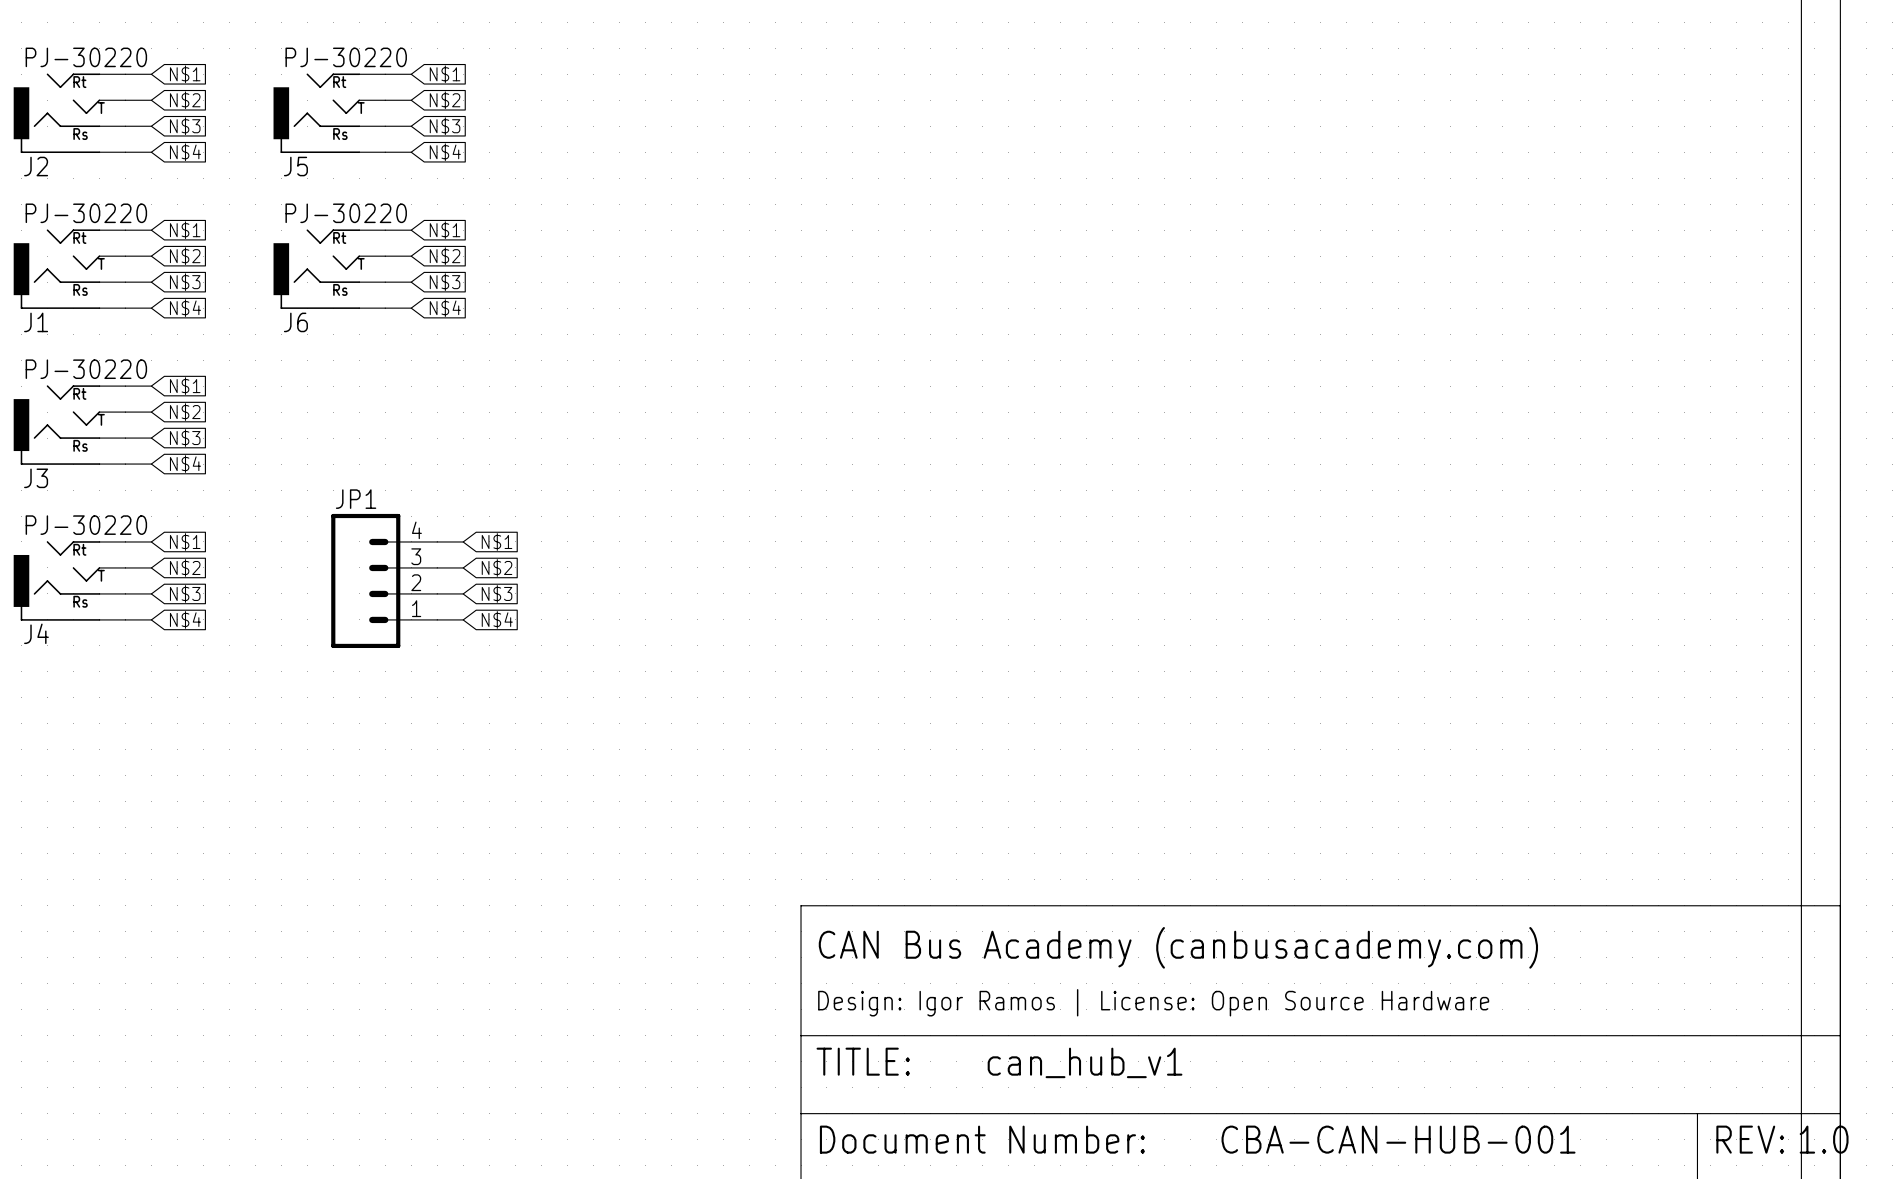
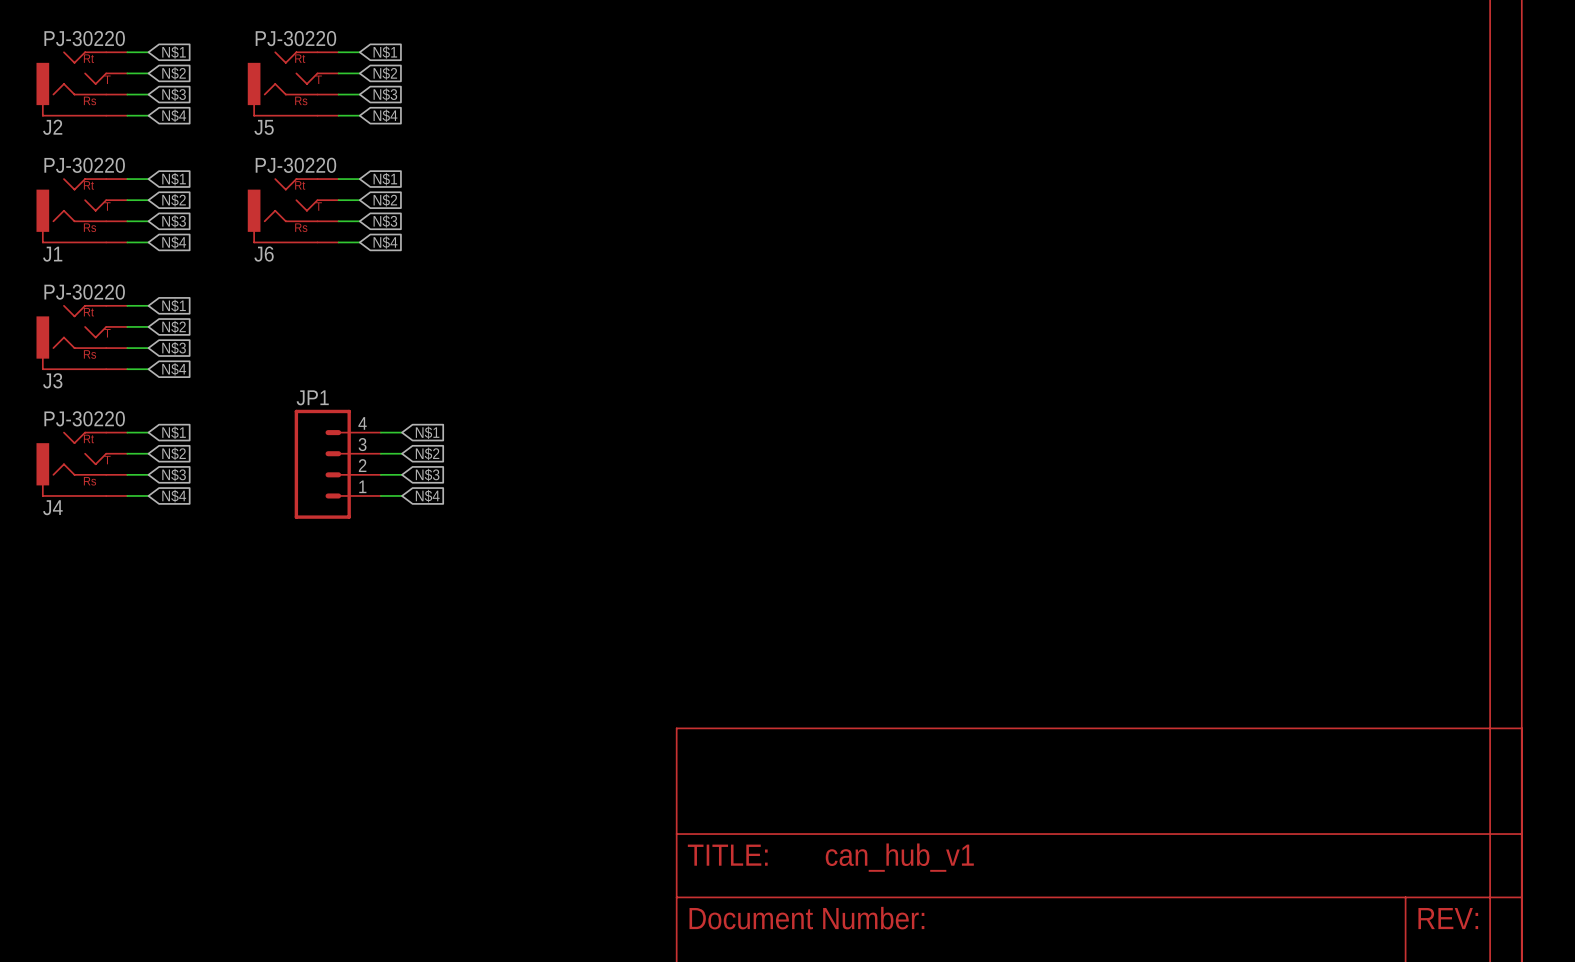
text: CAN Bus Academy (canbusacademy.com) (1178, 947) -> none
text: Design: Igor Ramos | License: Open Source Hardware (1153, 1002) -> none
text: CBA-CAN-HUB-001 (1398, 1139) -> none
text: 1.0 (1824, 1139) -> none

